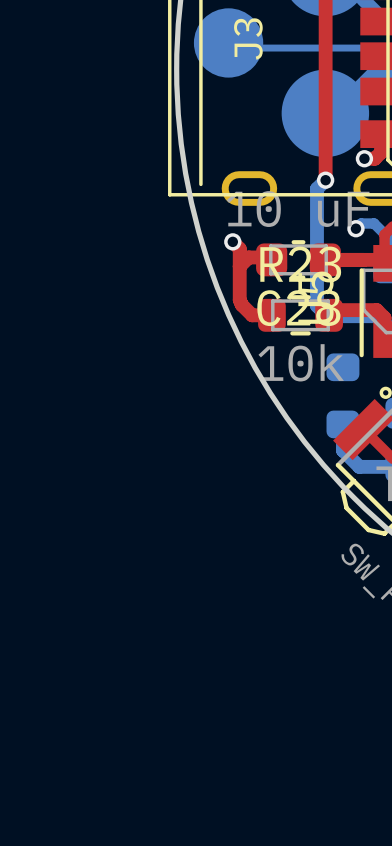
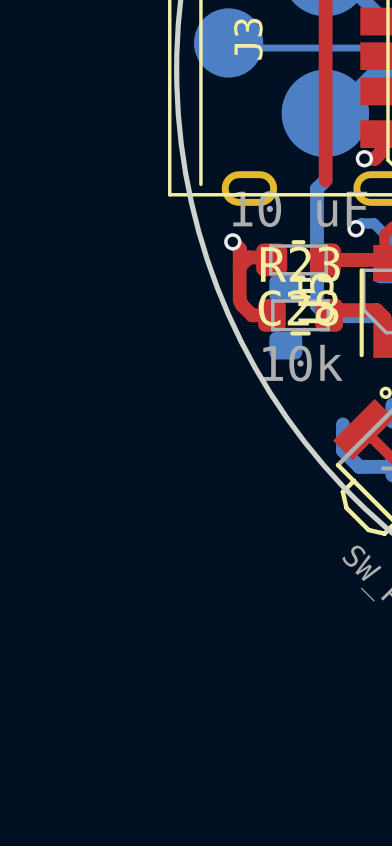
via: (325, 180) -> none
part: none -> (285, 317)
part: (342, 395) -> none

